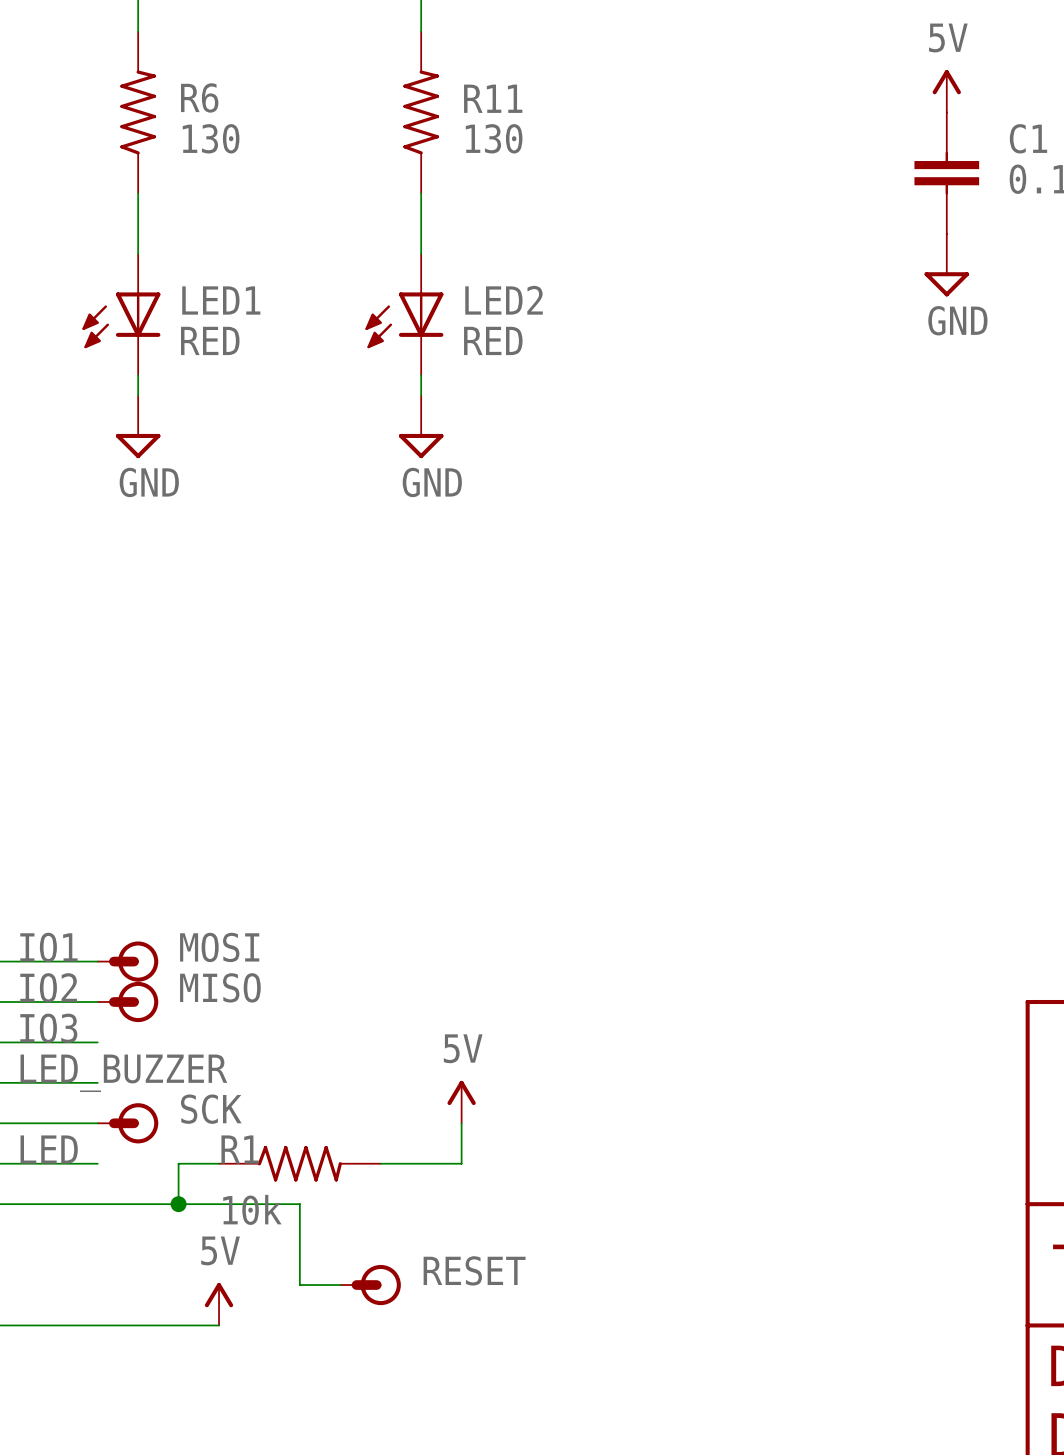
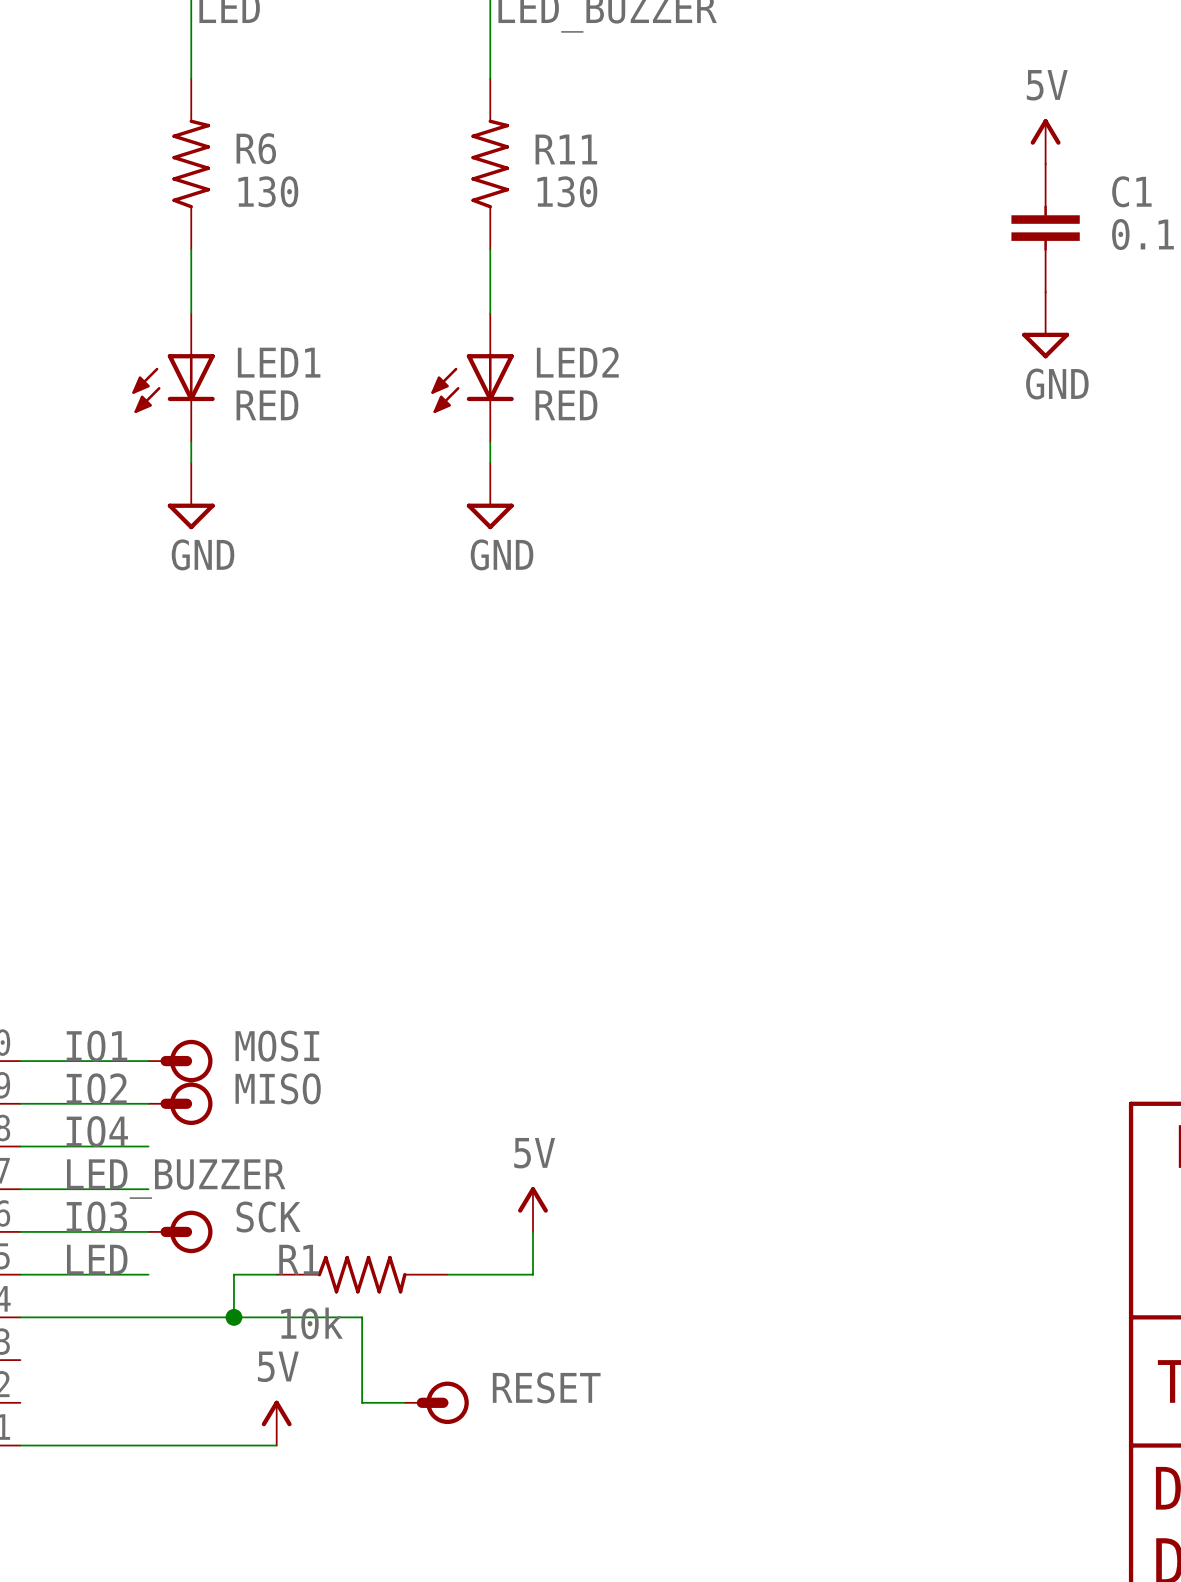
label: IO3 (48, 1028) -> IO4 (97, 1131)
label: none -> IO3 (96, 1217)

